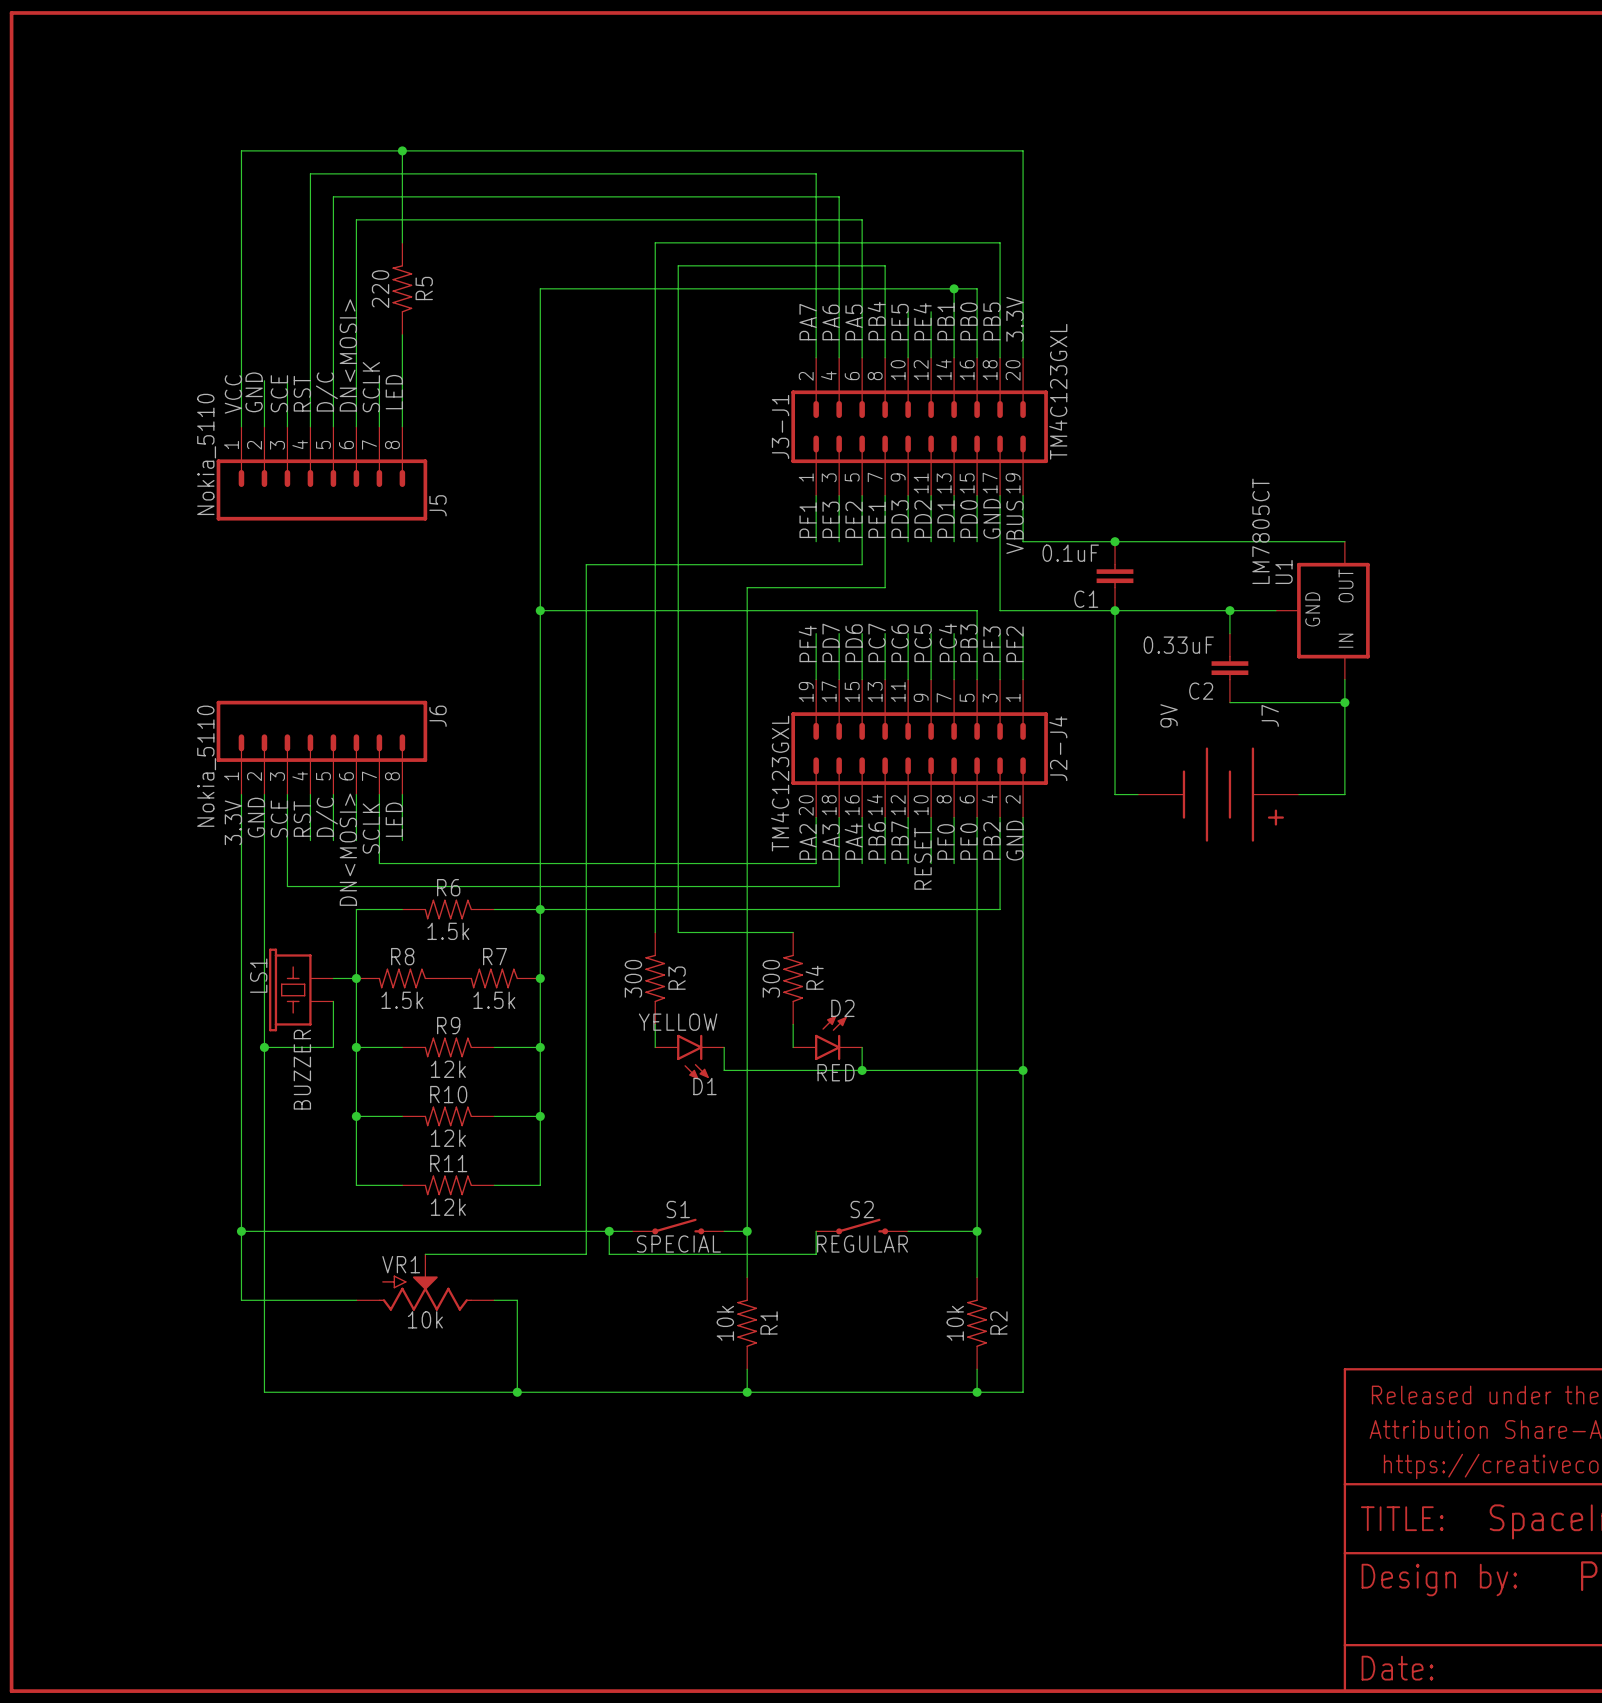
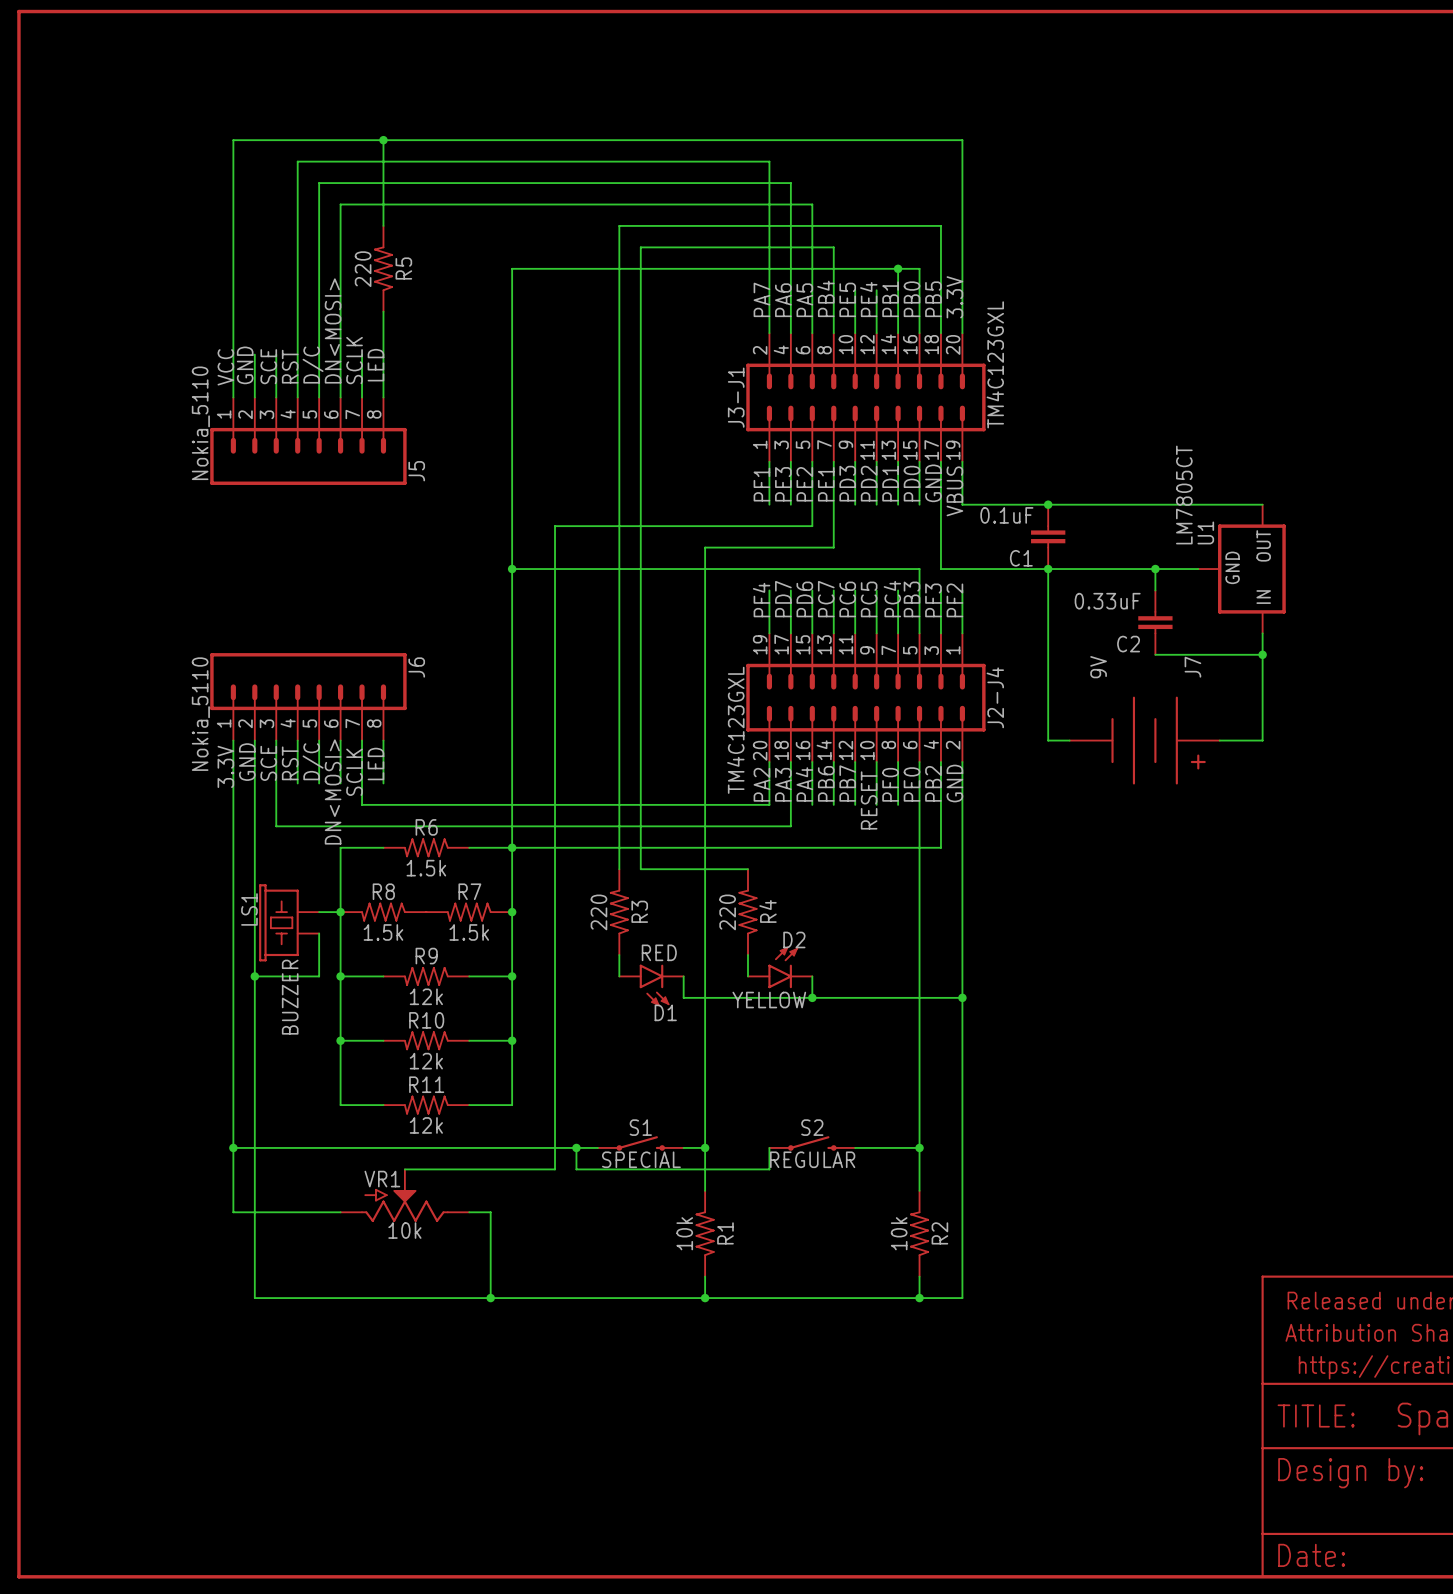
R3 value: 300 (633, 978) -> 220 (598, 912)
R4 value: 300 (771, 978) -> 220 (727, 912)
D1 value: YELLOW (678, 1022) -> RED (659, 952)
D2 value: RED (836, 1072) -> YELLOW (769, 1000)

